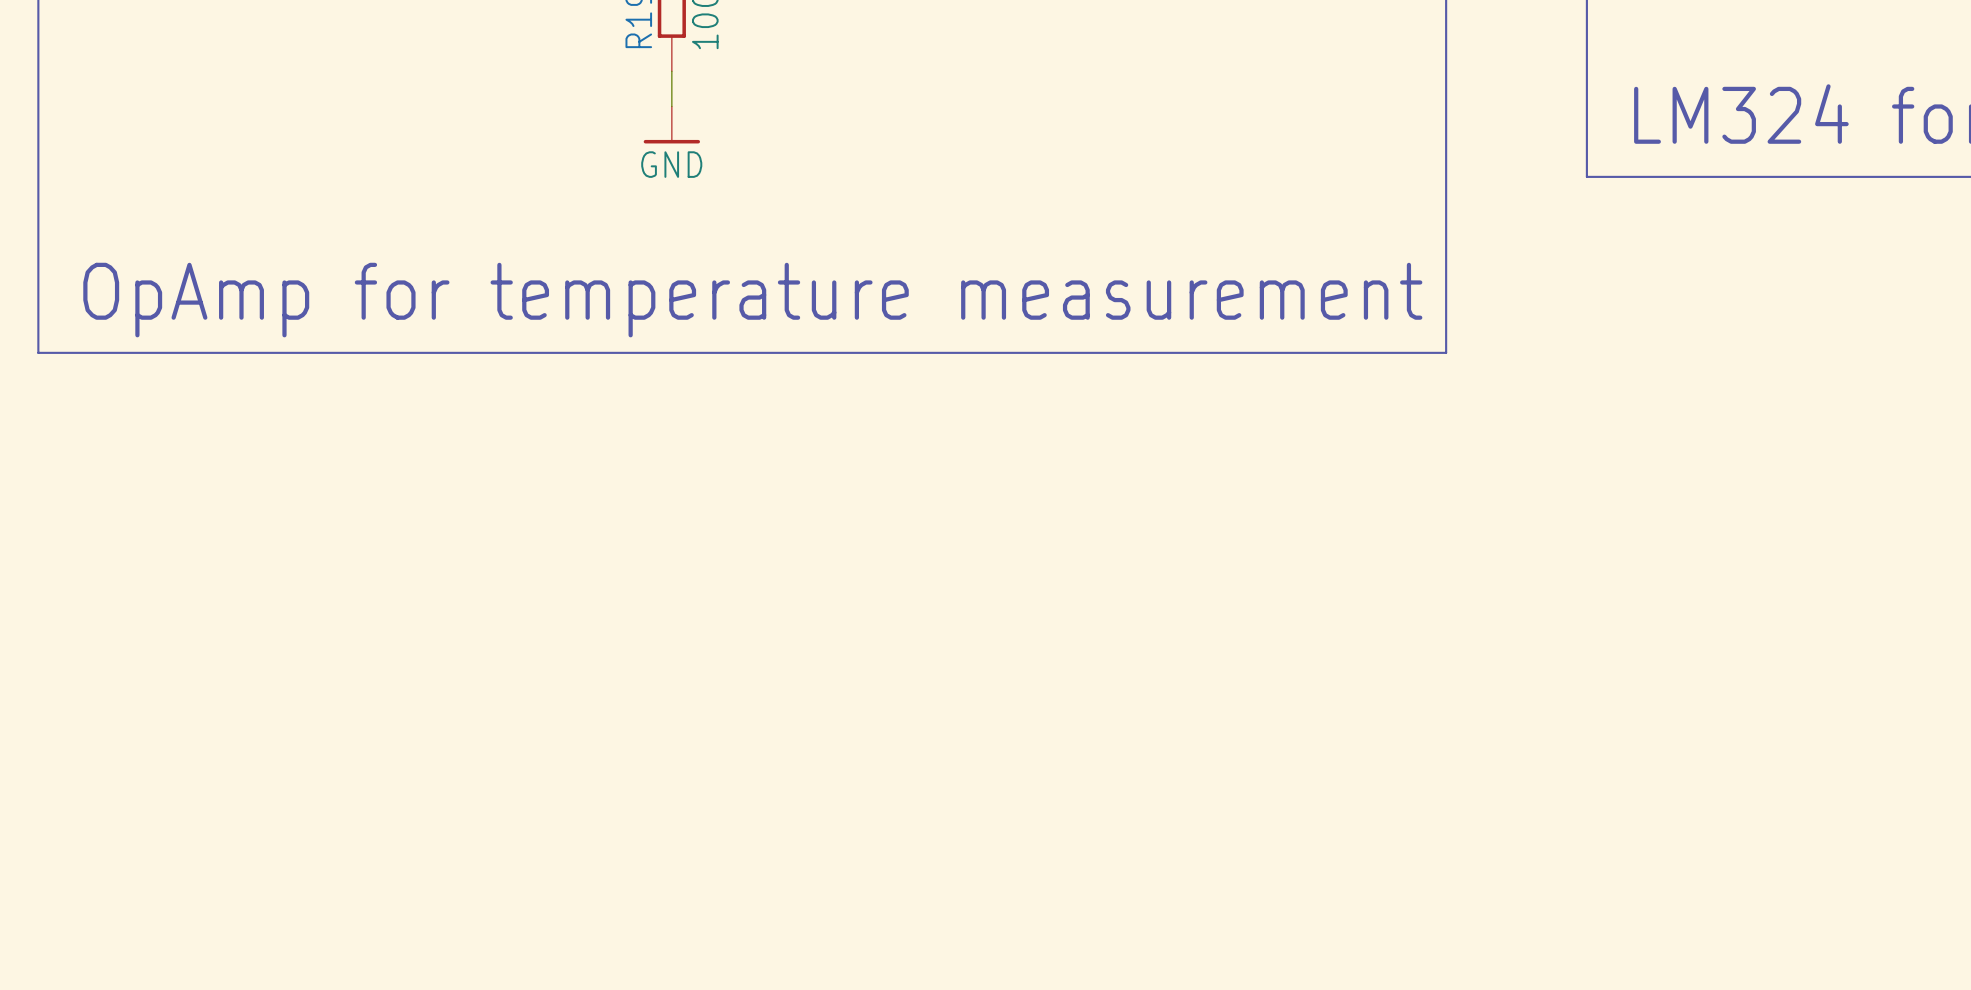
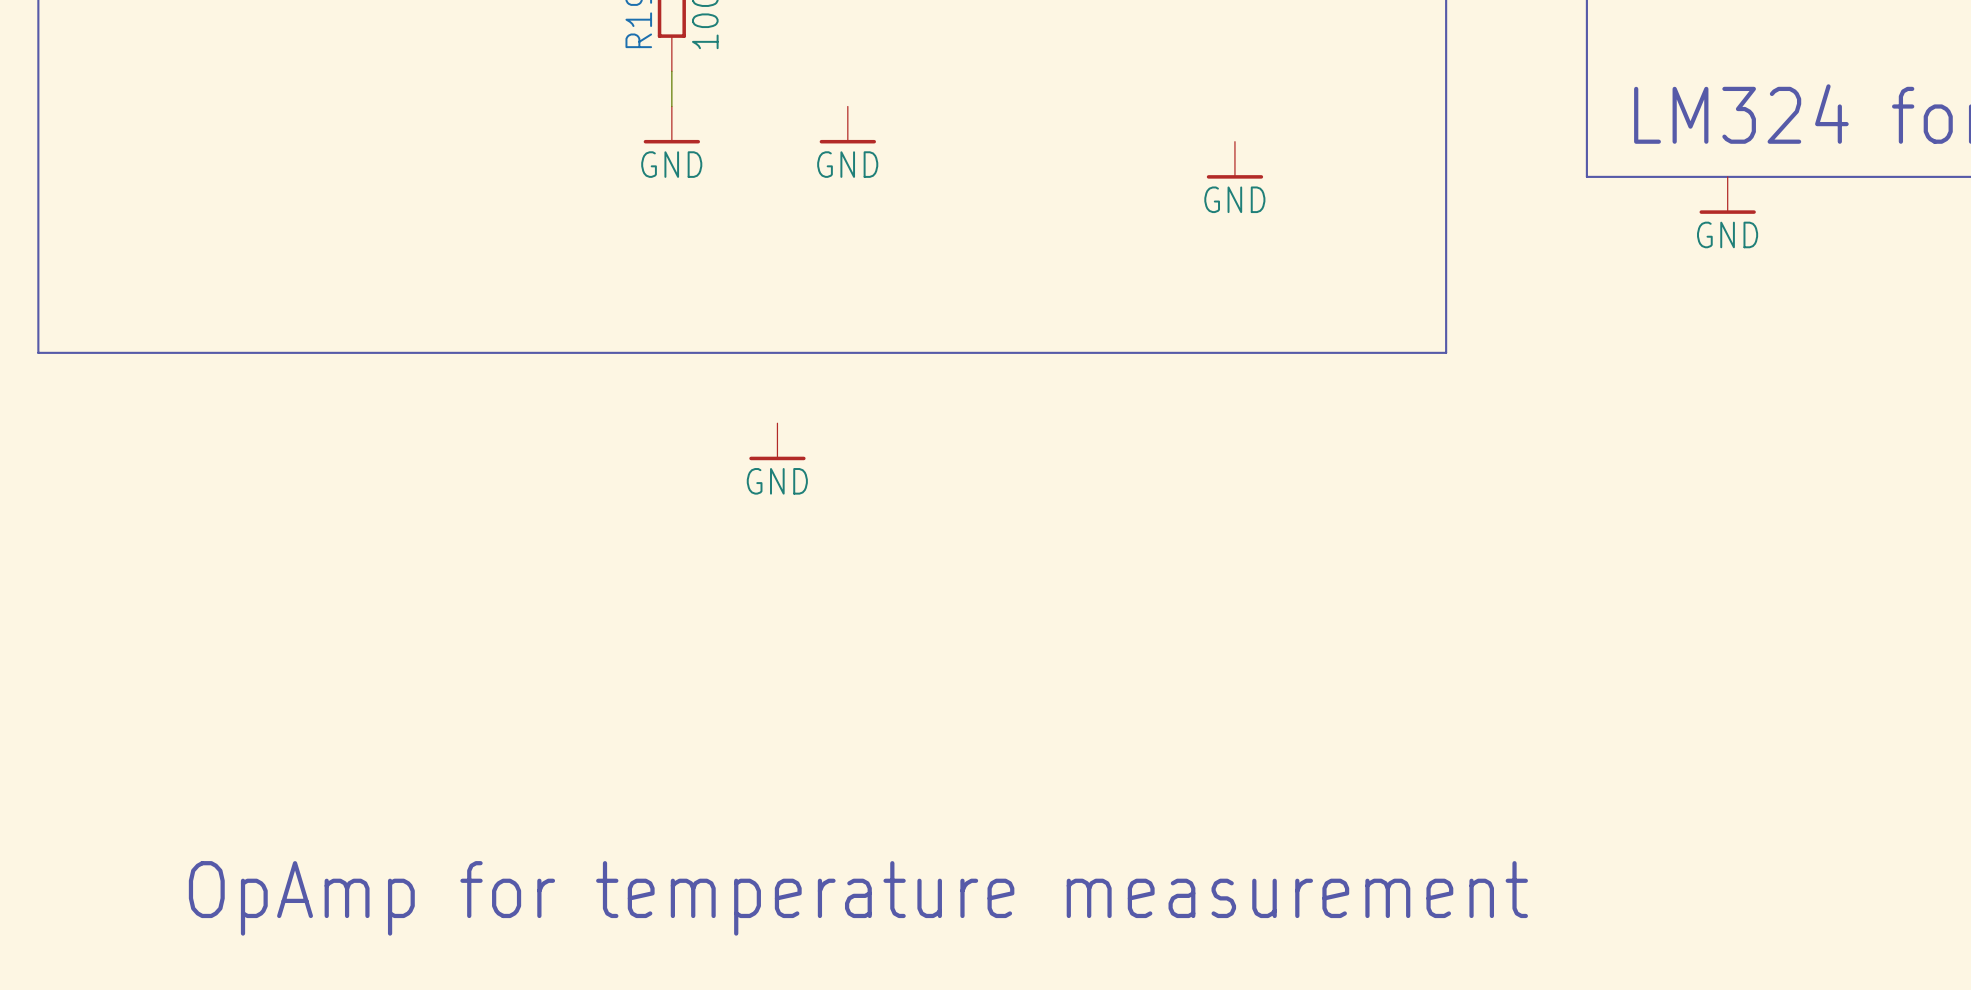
power symbol: none -> GND (847, 124)
power symbol: none -> GND (1234, 160)
power symbol: none -> GND (1727, 195)
text: OpAmp for temperature measurement (752, 300) -> none
power symbol: none -> GND (777, 441)
text: none -> OpAmp for temperature measurement (858, 898)

